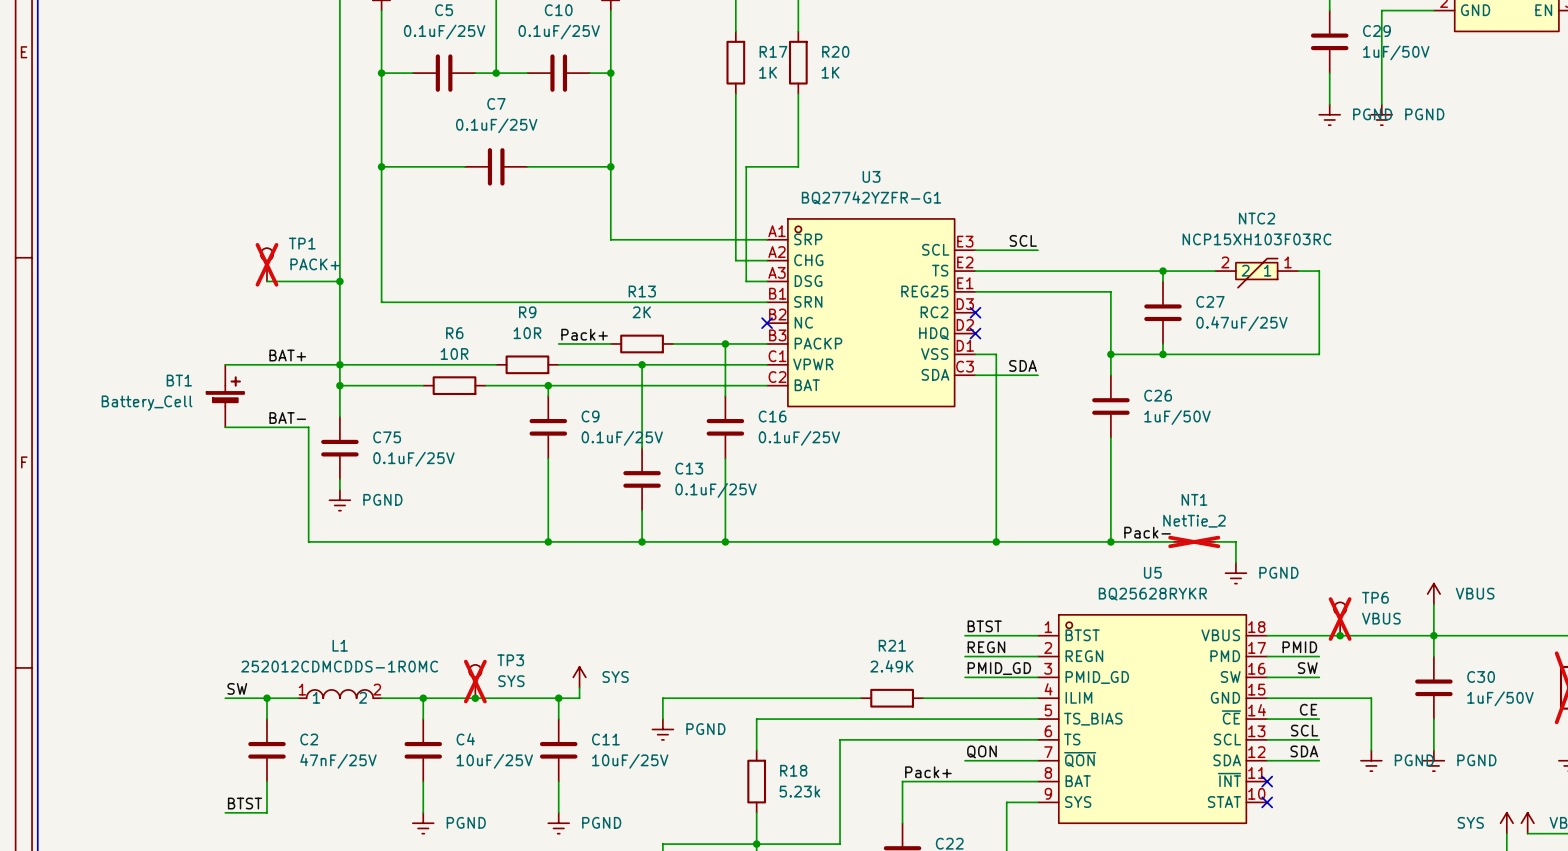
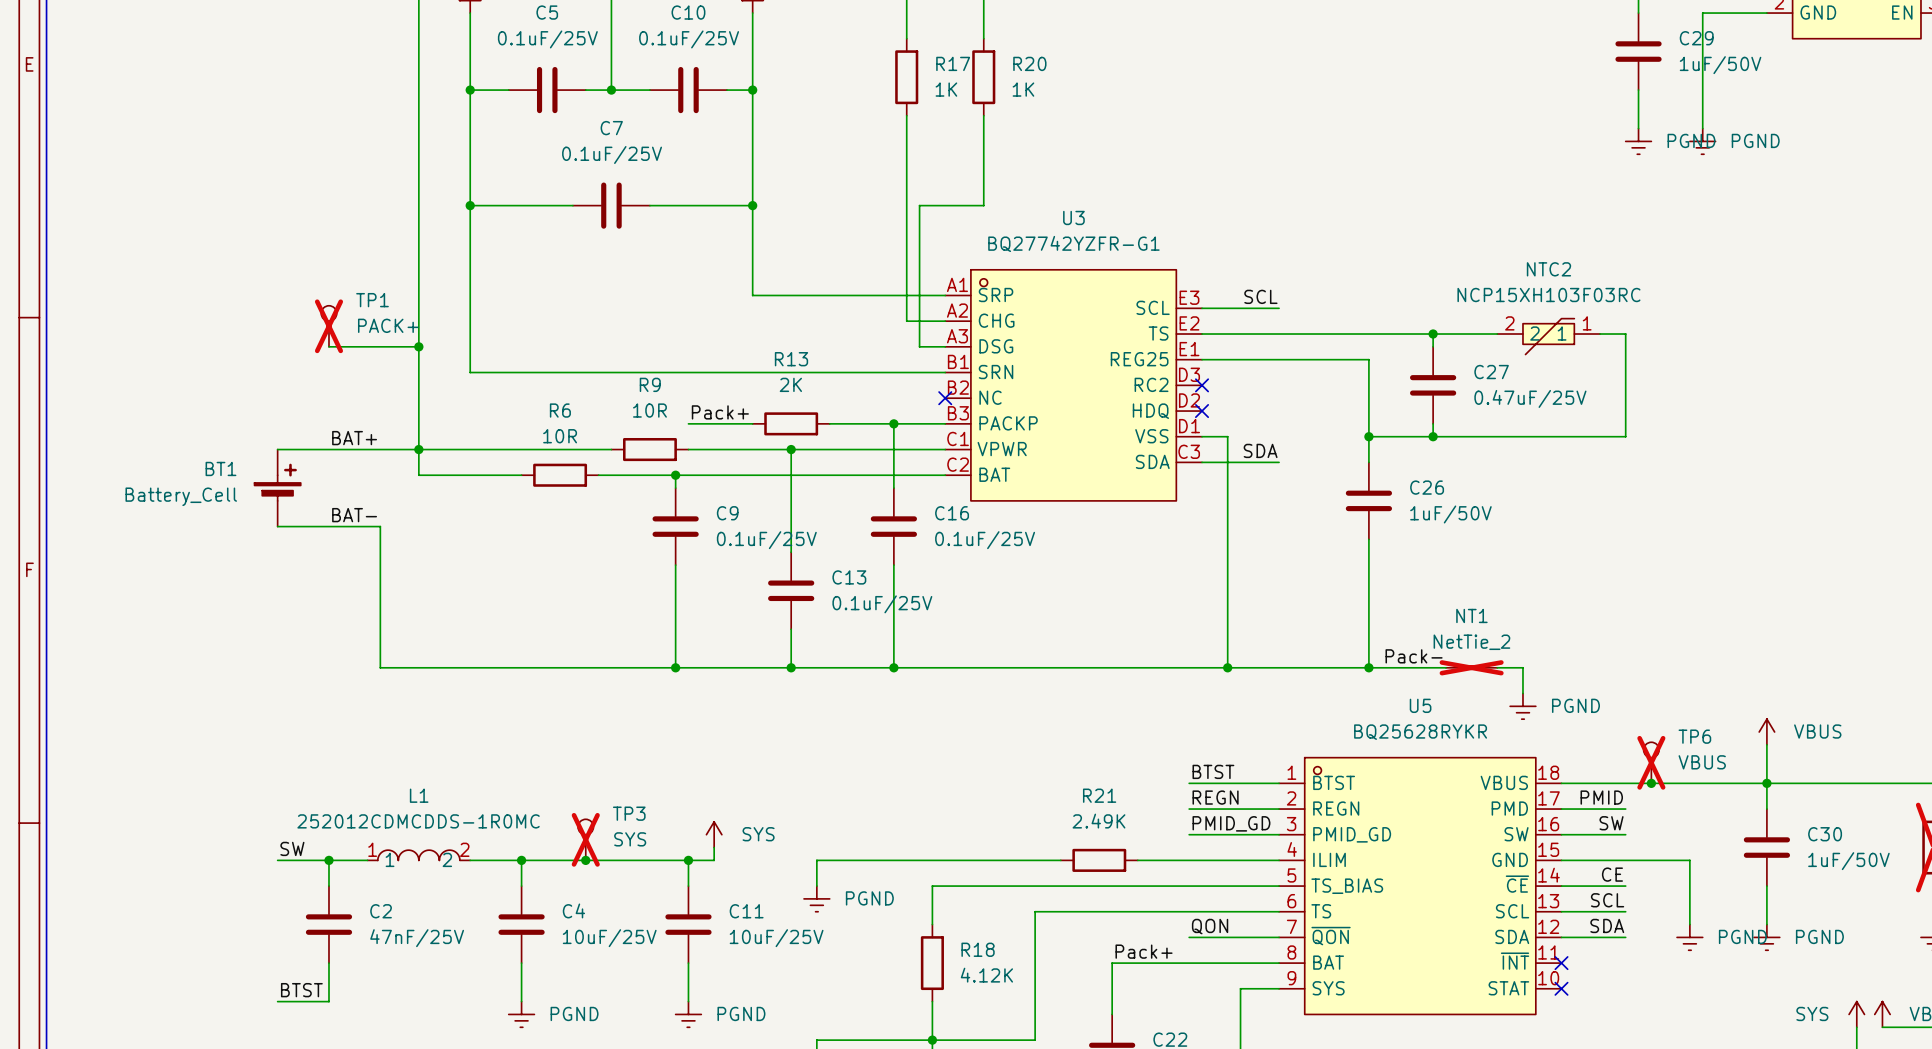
wire: (339, 385) (339, 416) -> none
junction: (339, 385) -> none
C75: 0.1uF/25V (339, 448) -> none
wire: (339, 479) (339, 489) -> none
power symbol: PGND (339, 500) -> none
R18 value: 5.23k (799, 791) -> 4.12K (986, 975)

